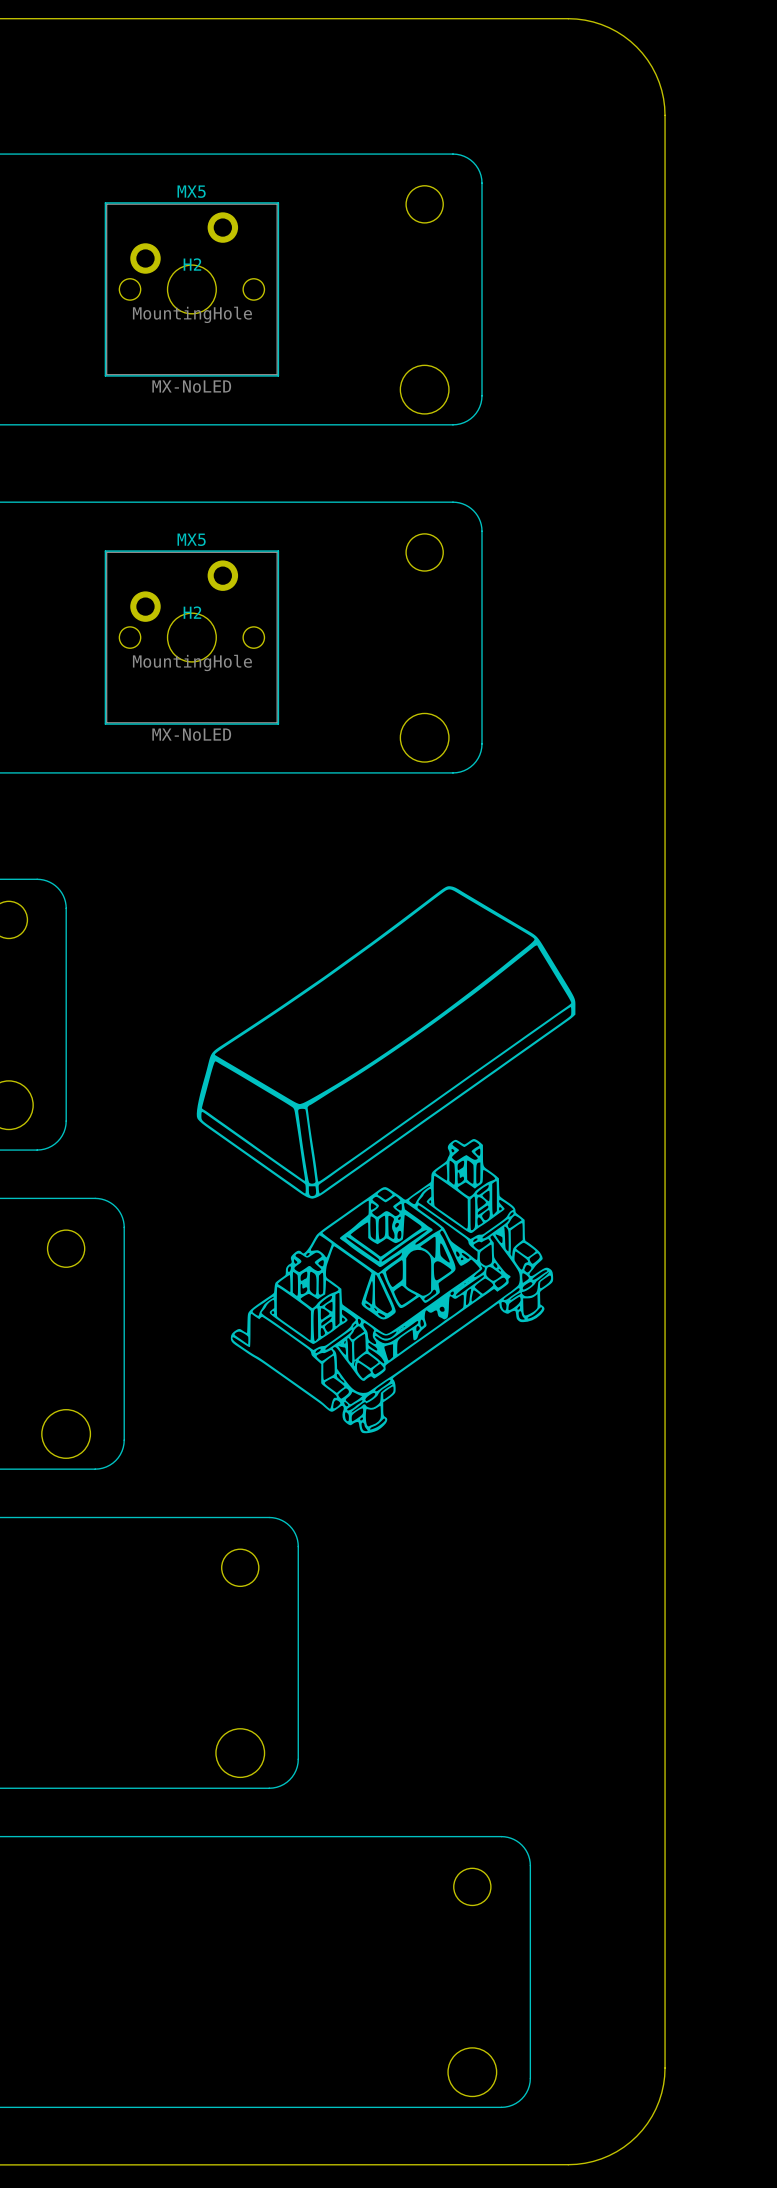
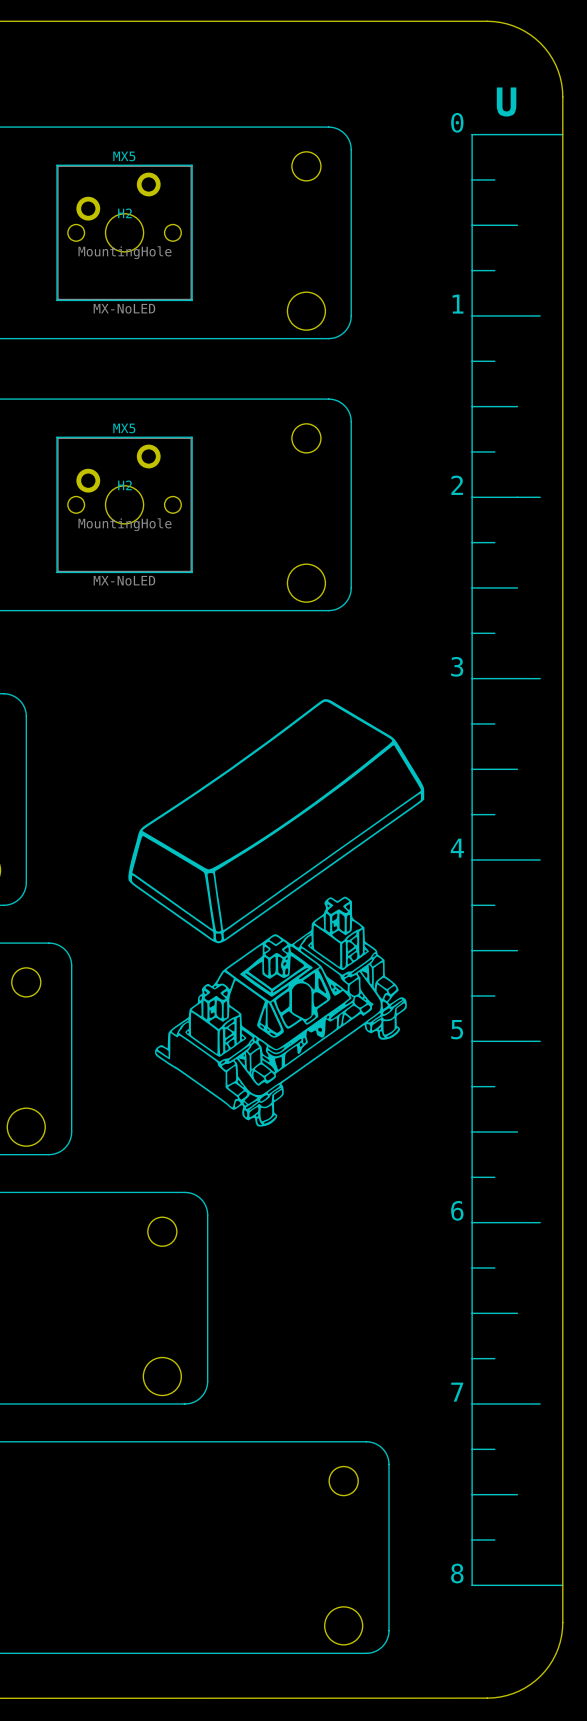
board edge: (568, 18) (593, 21) (609, 27) (636, 47) (655, 74) (661, 90) (665, 115) (664, 2076) (655, 2108) (642, 2130) (630, 2142) (601, 2158) (568, 2164) -> (418, 21) (493, 21) (506, 23) (525, 31) (540, 43) (552, 59) (560, 77) (562, 96) (562, 1629) (558, 1648) (549, 1665) (535, 1680) (519, 1691) (493, 1697) (418, 1698)
text: none -> U (506, 102)
text: none -> 0 (457, 122)
line: none -> (562, 134) (472, 134) (472, 1585) (562, 1585)
line: none -> (472, 179) (494, 179)
line: none -> (472, 225) (517, 225)
line: none -> (472, 270) (494, 270)
text: none -> 1 (458, 304)
line: none -> (472, 315) (540, 315)
line: none -> (472, 361) (494, 361)
line: none -> (472, 406) (517, 406)
line: none -> (472, 451) (494, 451)
text: none -> 2 (457, 485)
line: none -> (472, 497) (540, 497)
line: none -> (472, 542) (494, 542)
line: none -> (472, 587) (517, 587)
line: none -> (472, 633) (494, 633)
text: none -> 3 (457, 666)
line: none -> (472, 678) (540, 678)
line: none -> (472, 723) (494, 723)
line: none -> (472, 769) (517, 769)
line: none -> (472, 814) (494, 814)
text: none -> 4 (457, 848)
line: none -> (472, 859) (540, 859)
line: none -> (472, 905) (494, 905)
line: none -> (472, 950) (517, 950)
line: none -> (472, 995) (494, 995)
text: none -> 5 (457, 1029)
line: none -> (472, 1041) (540, 1041)
line: none -> (472, 1086) (494, 1086)
line: none -> (472, 1131) (517, 1131)
line: none -> (472, 1177) (494, 1177)
text: none -> 6 (457, 1210)
line: none -> (472, 1222) (540, 1222)
line: none -> (472, 1267) (494, 1267)
line: none -> (472, 1313) (517, 1313)
line: none -> (472, 1358) (494, 1358)
text: none -> 7 (457, 1392)
line: none -> (472, 1404) (540, 1404)
line: none -> (472, 1449) (494, 1449)
line: none -> (472, 1494) (517, 1494)
line: none -> (472, 1540) (494, 1540)
text: none -> 8 (457, 1573)

